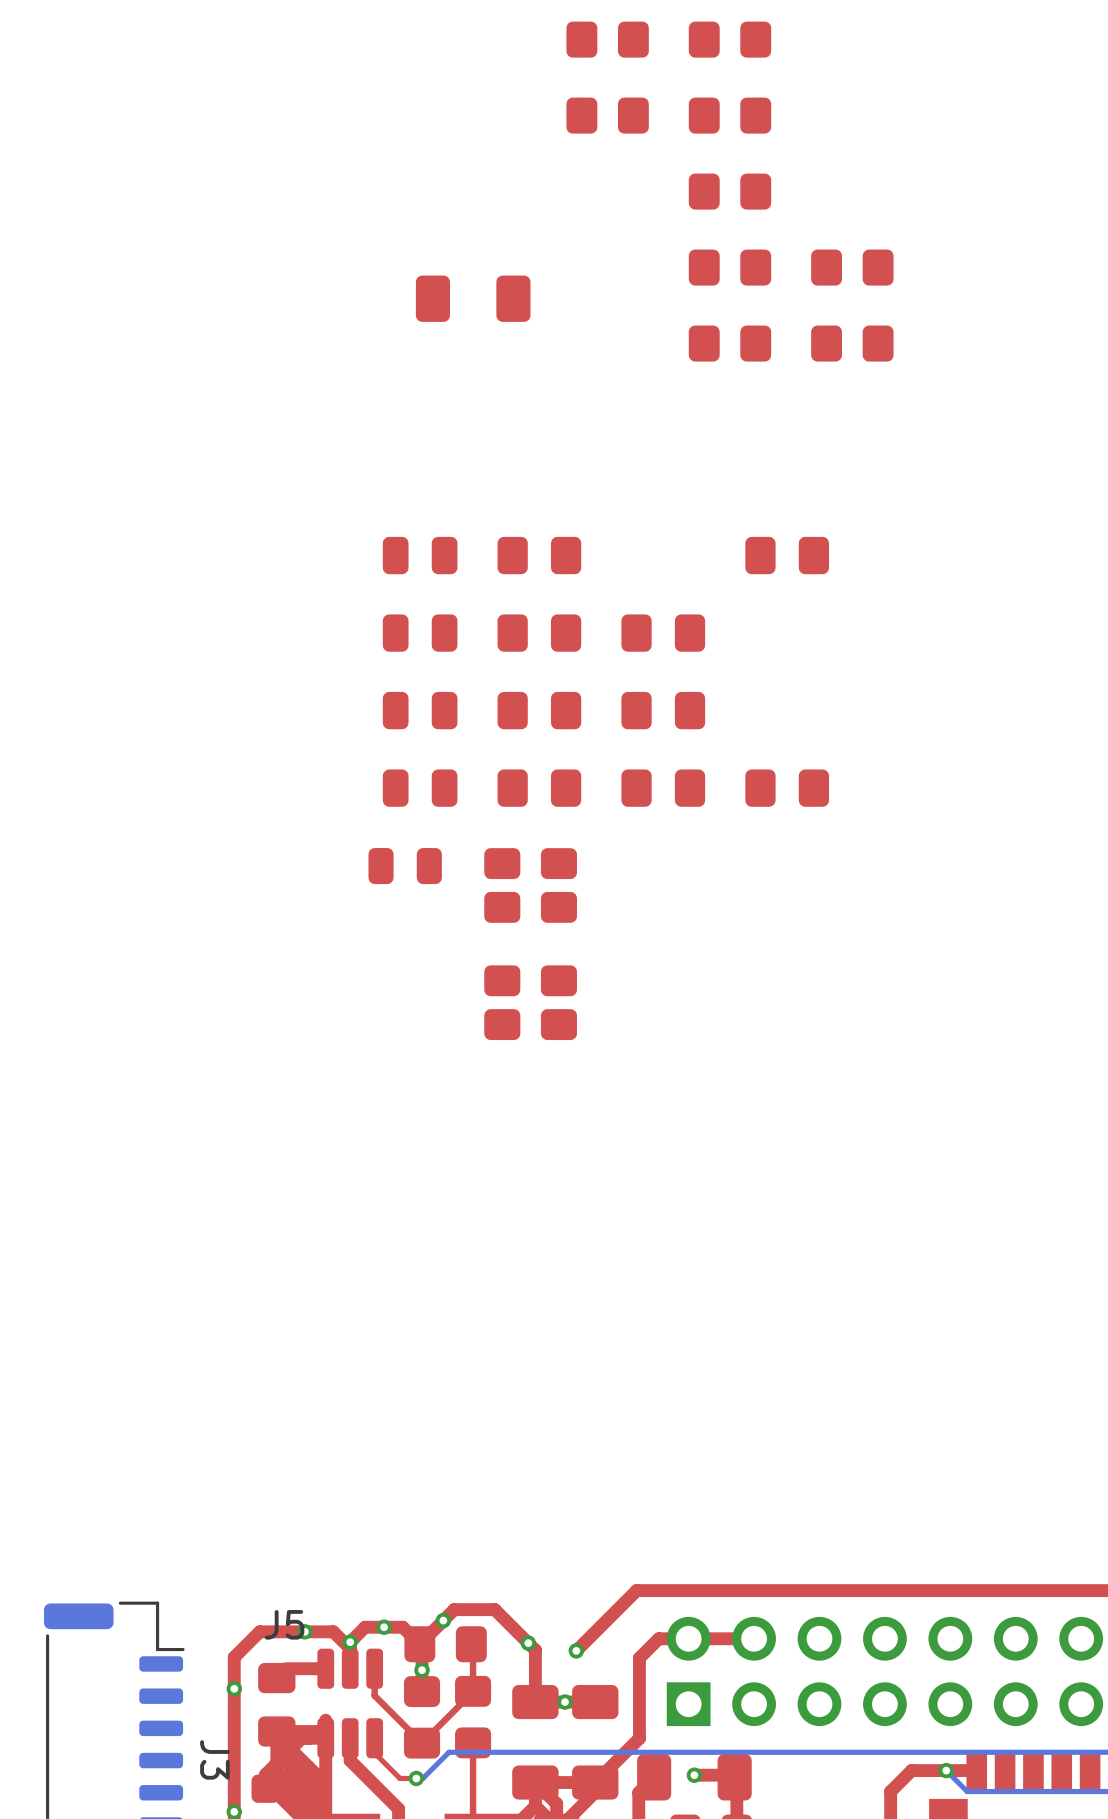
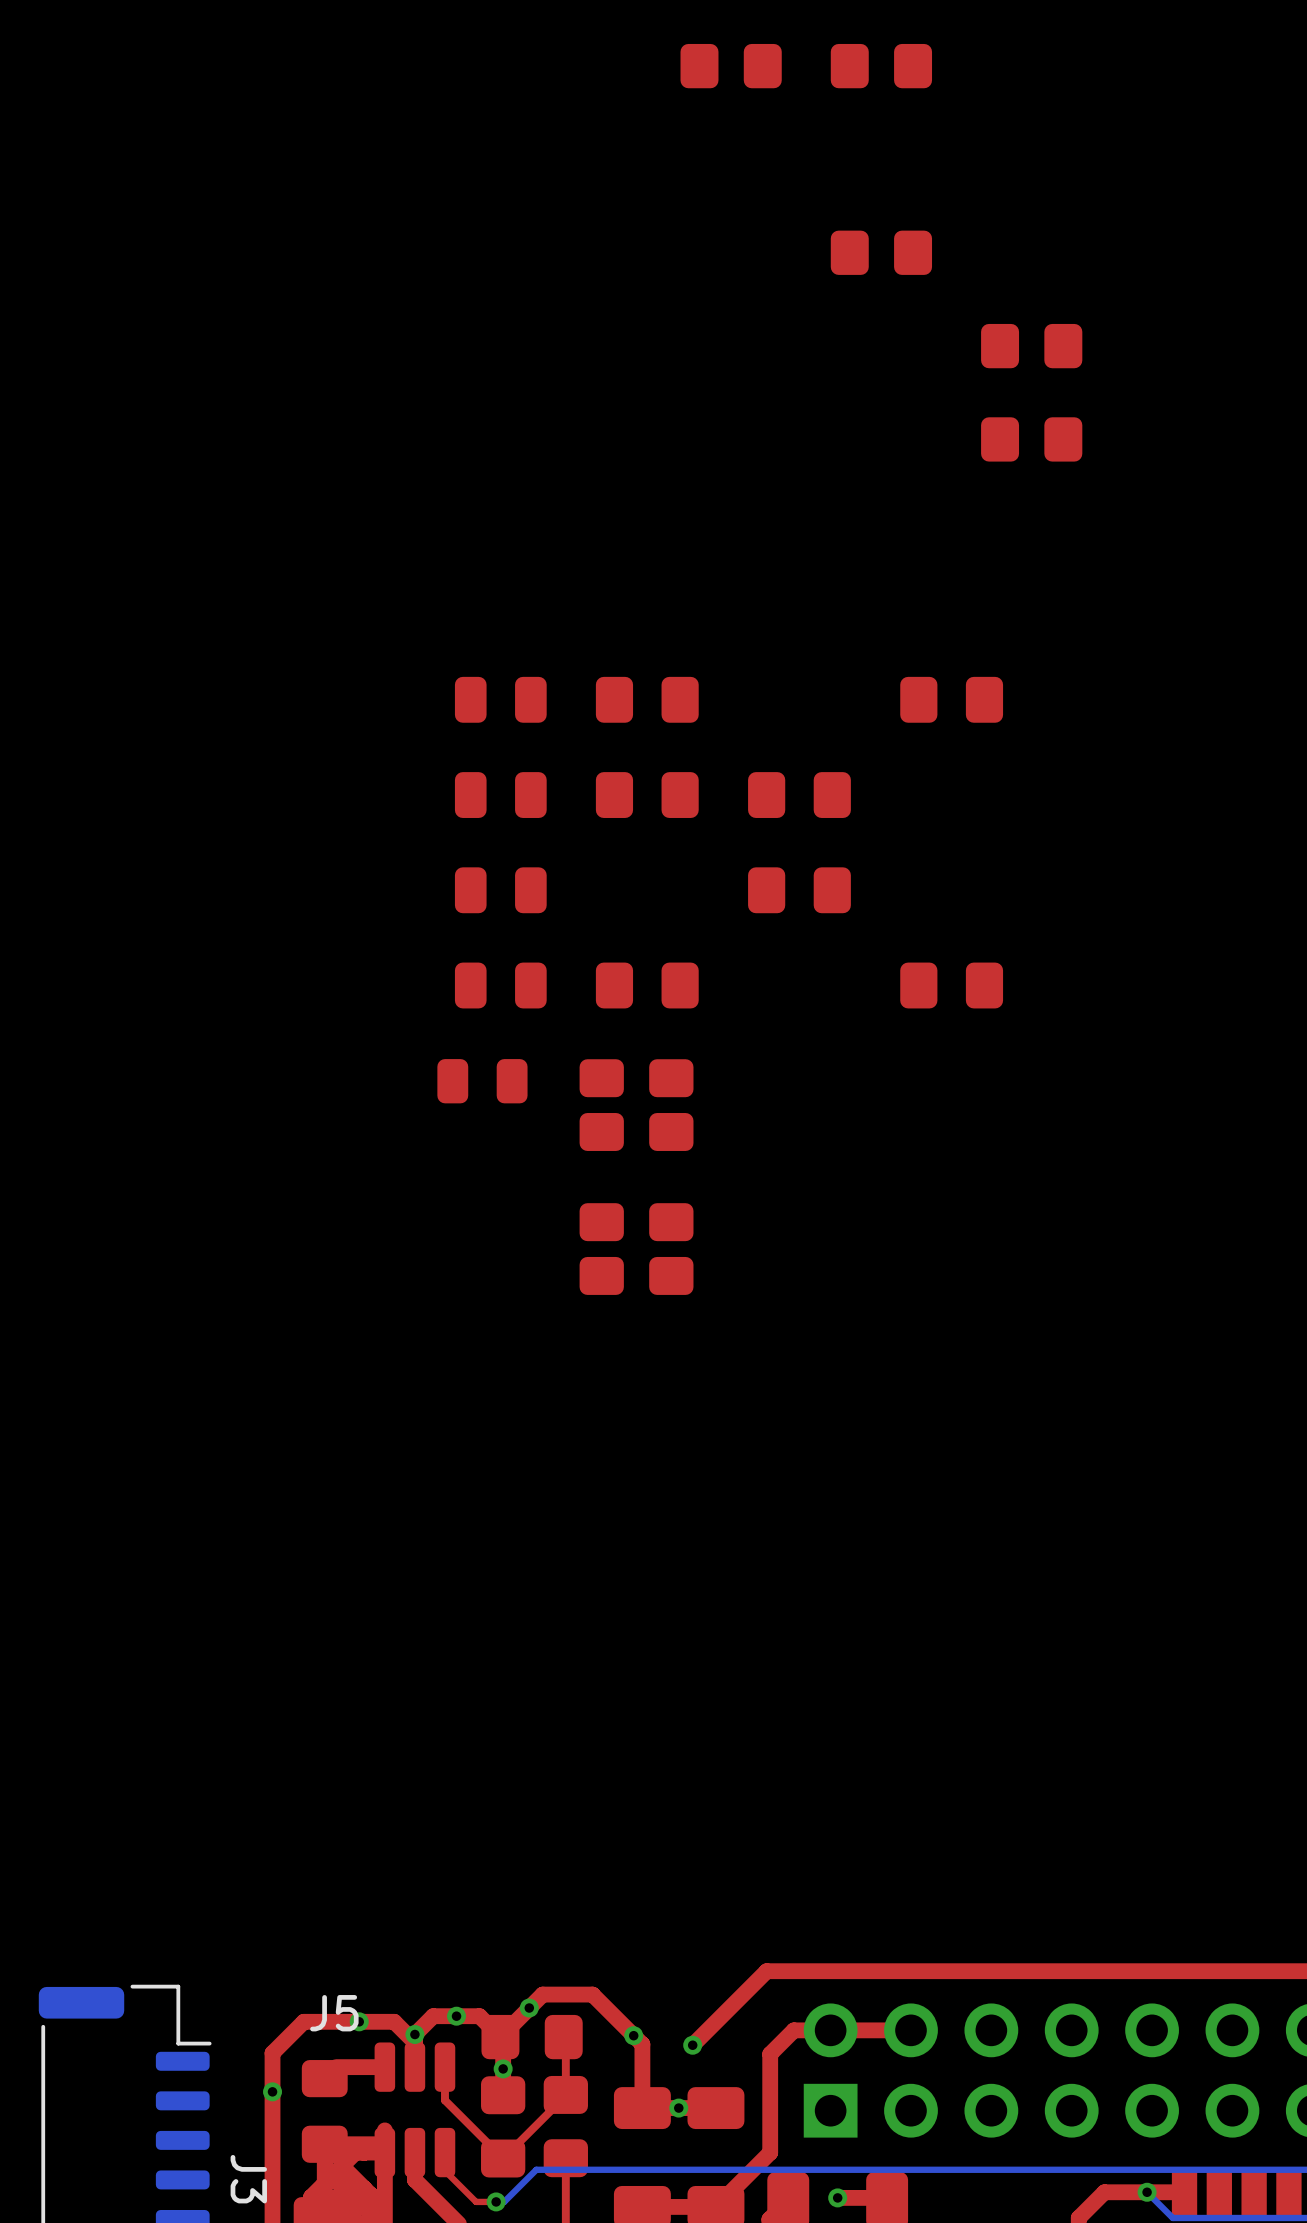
part: (607, 115) -> none
part: (729, 115) -> none
part: (729, 267) -> none
part: (473, 298) -> none
part: (729, 343) -> none
part: (539, 710) -> none
part: (663, 788) -> none

